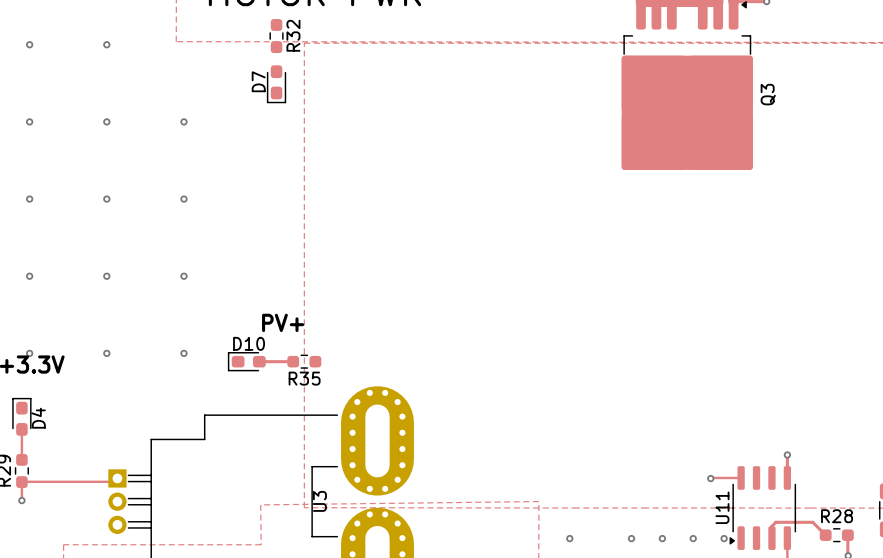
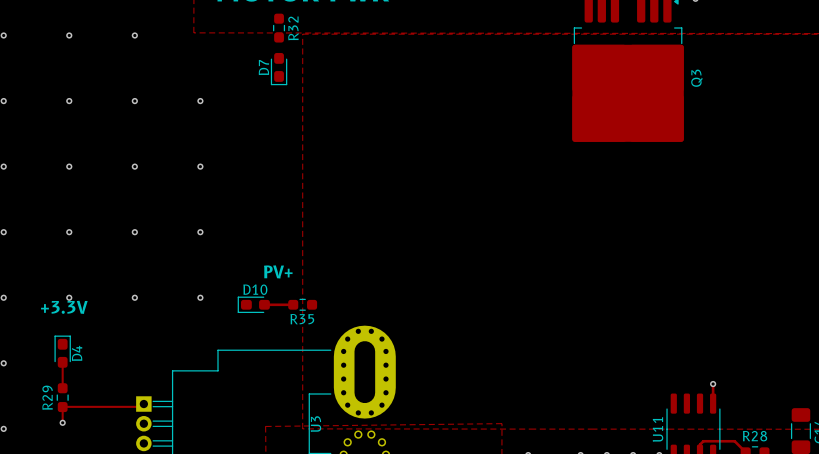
track: (741, 477) (710, 478) -> none
via: (710, 478) -> none

